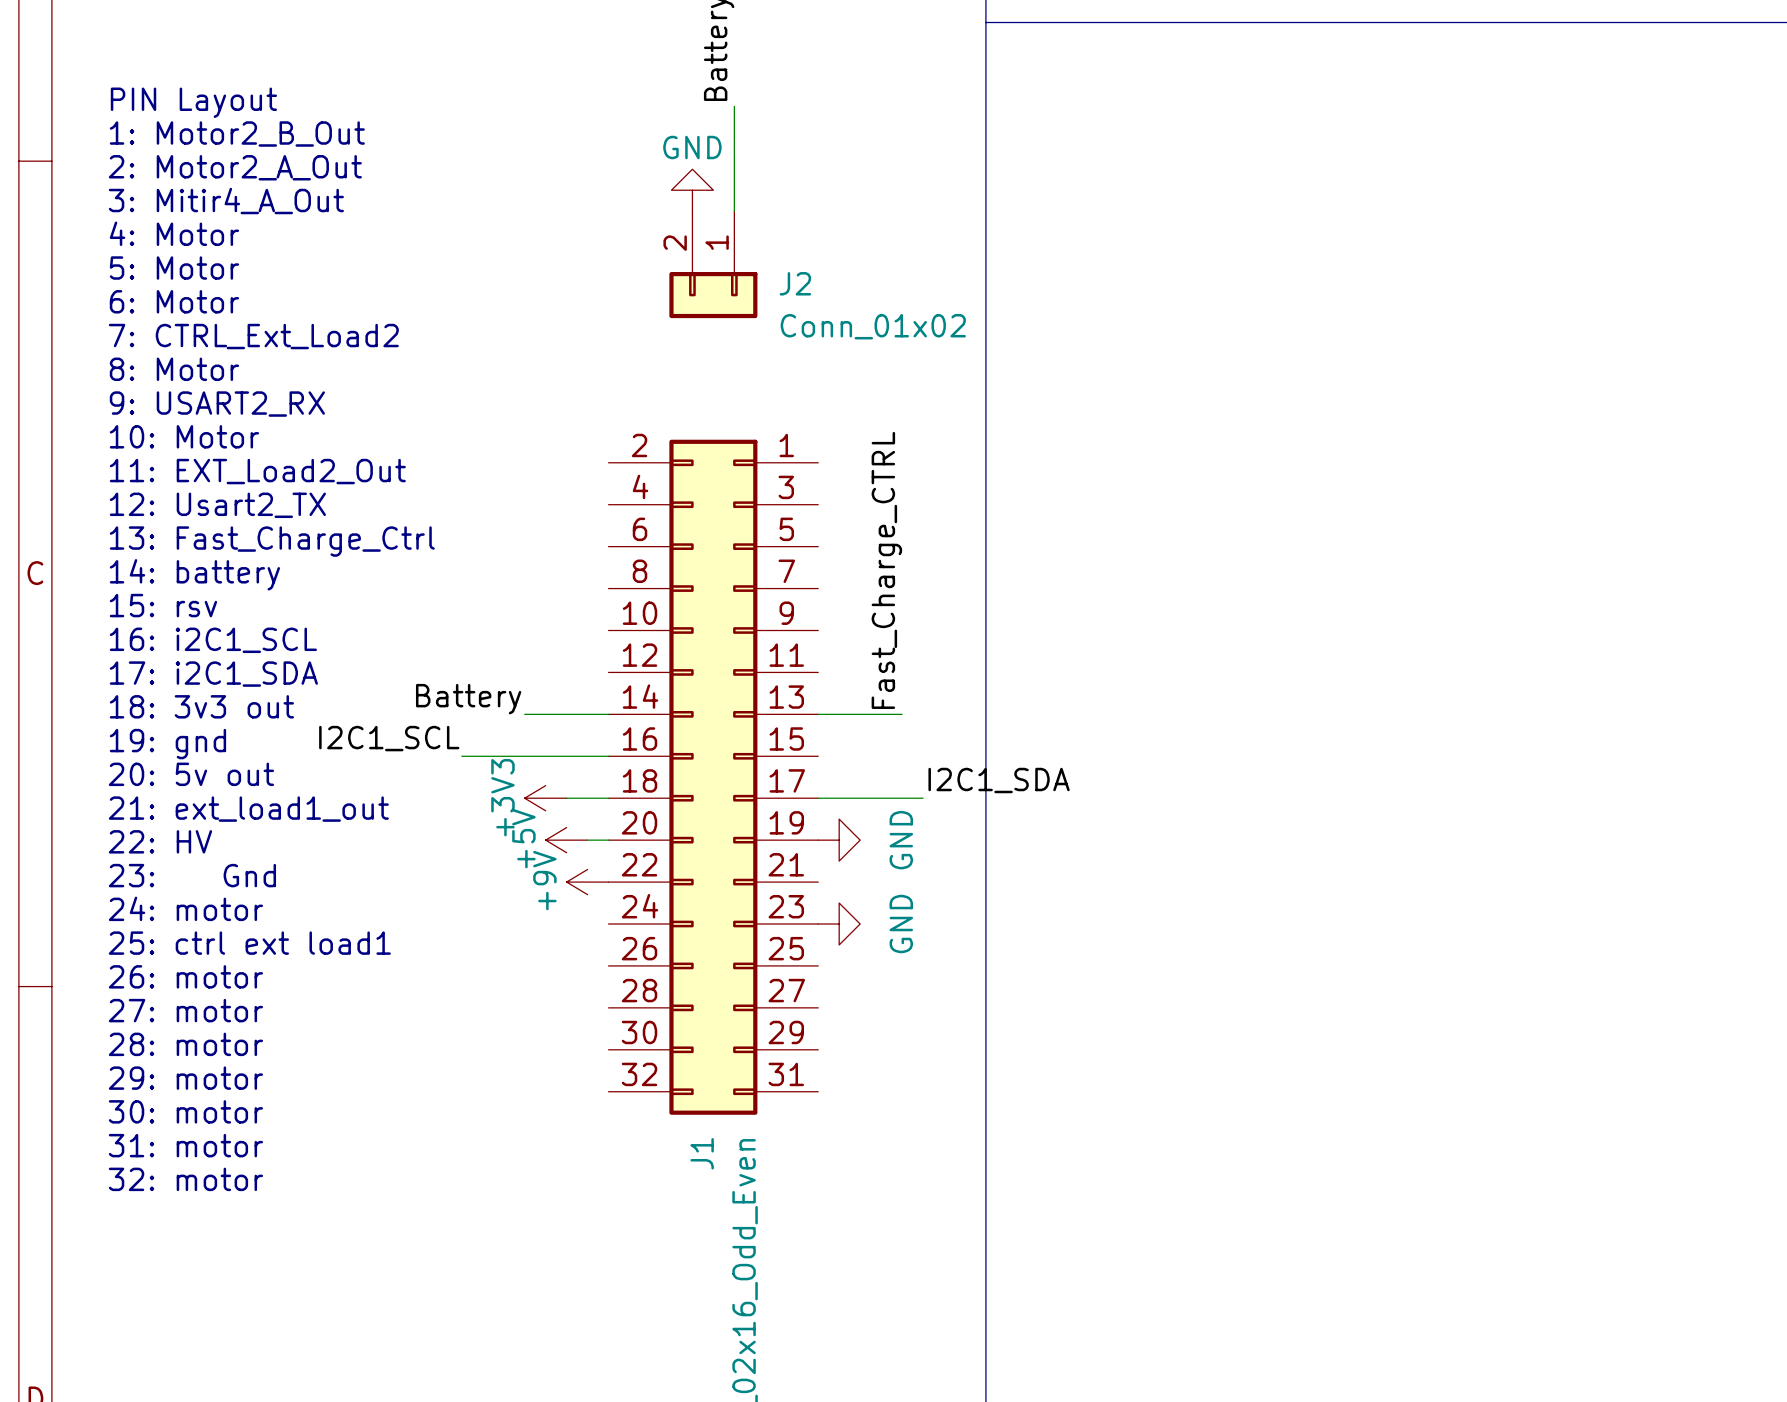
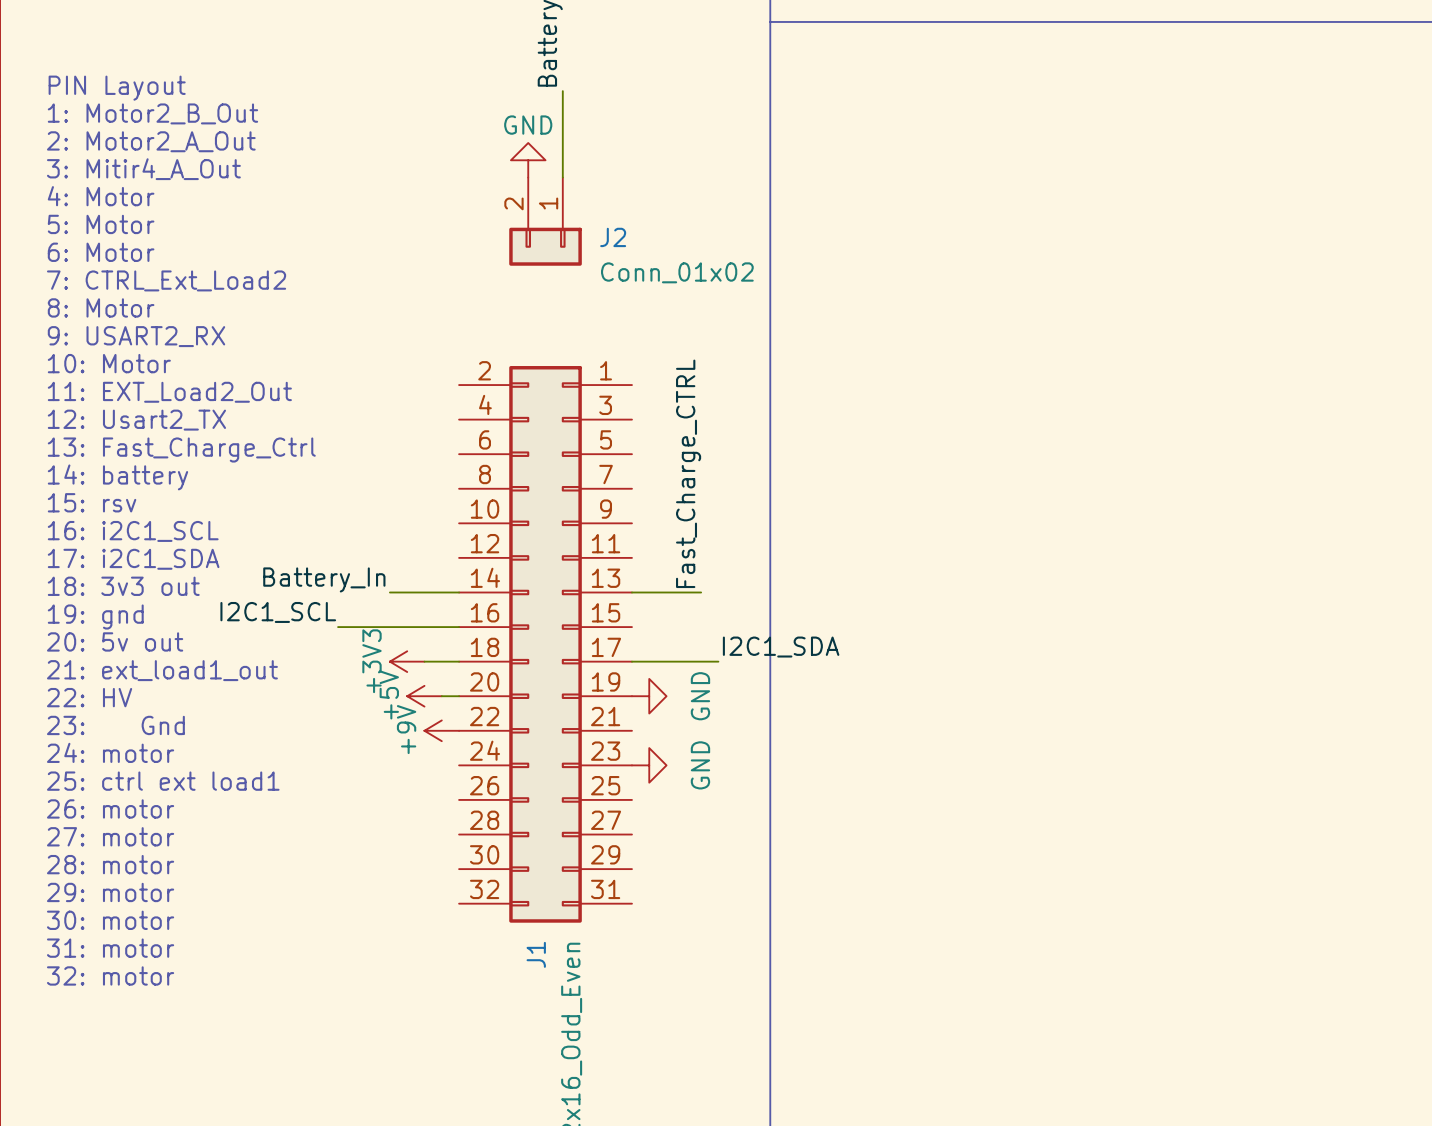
label: Battery (468, 699) -> Battery_In (324, 579)

